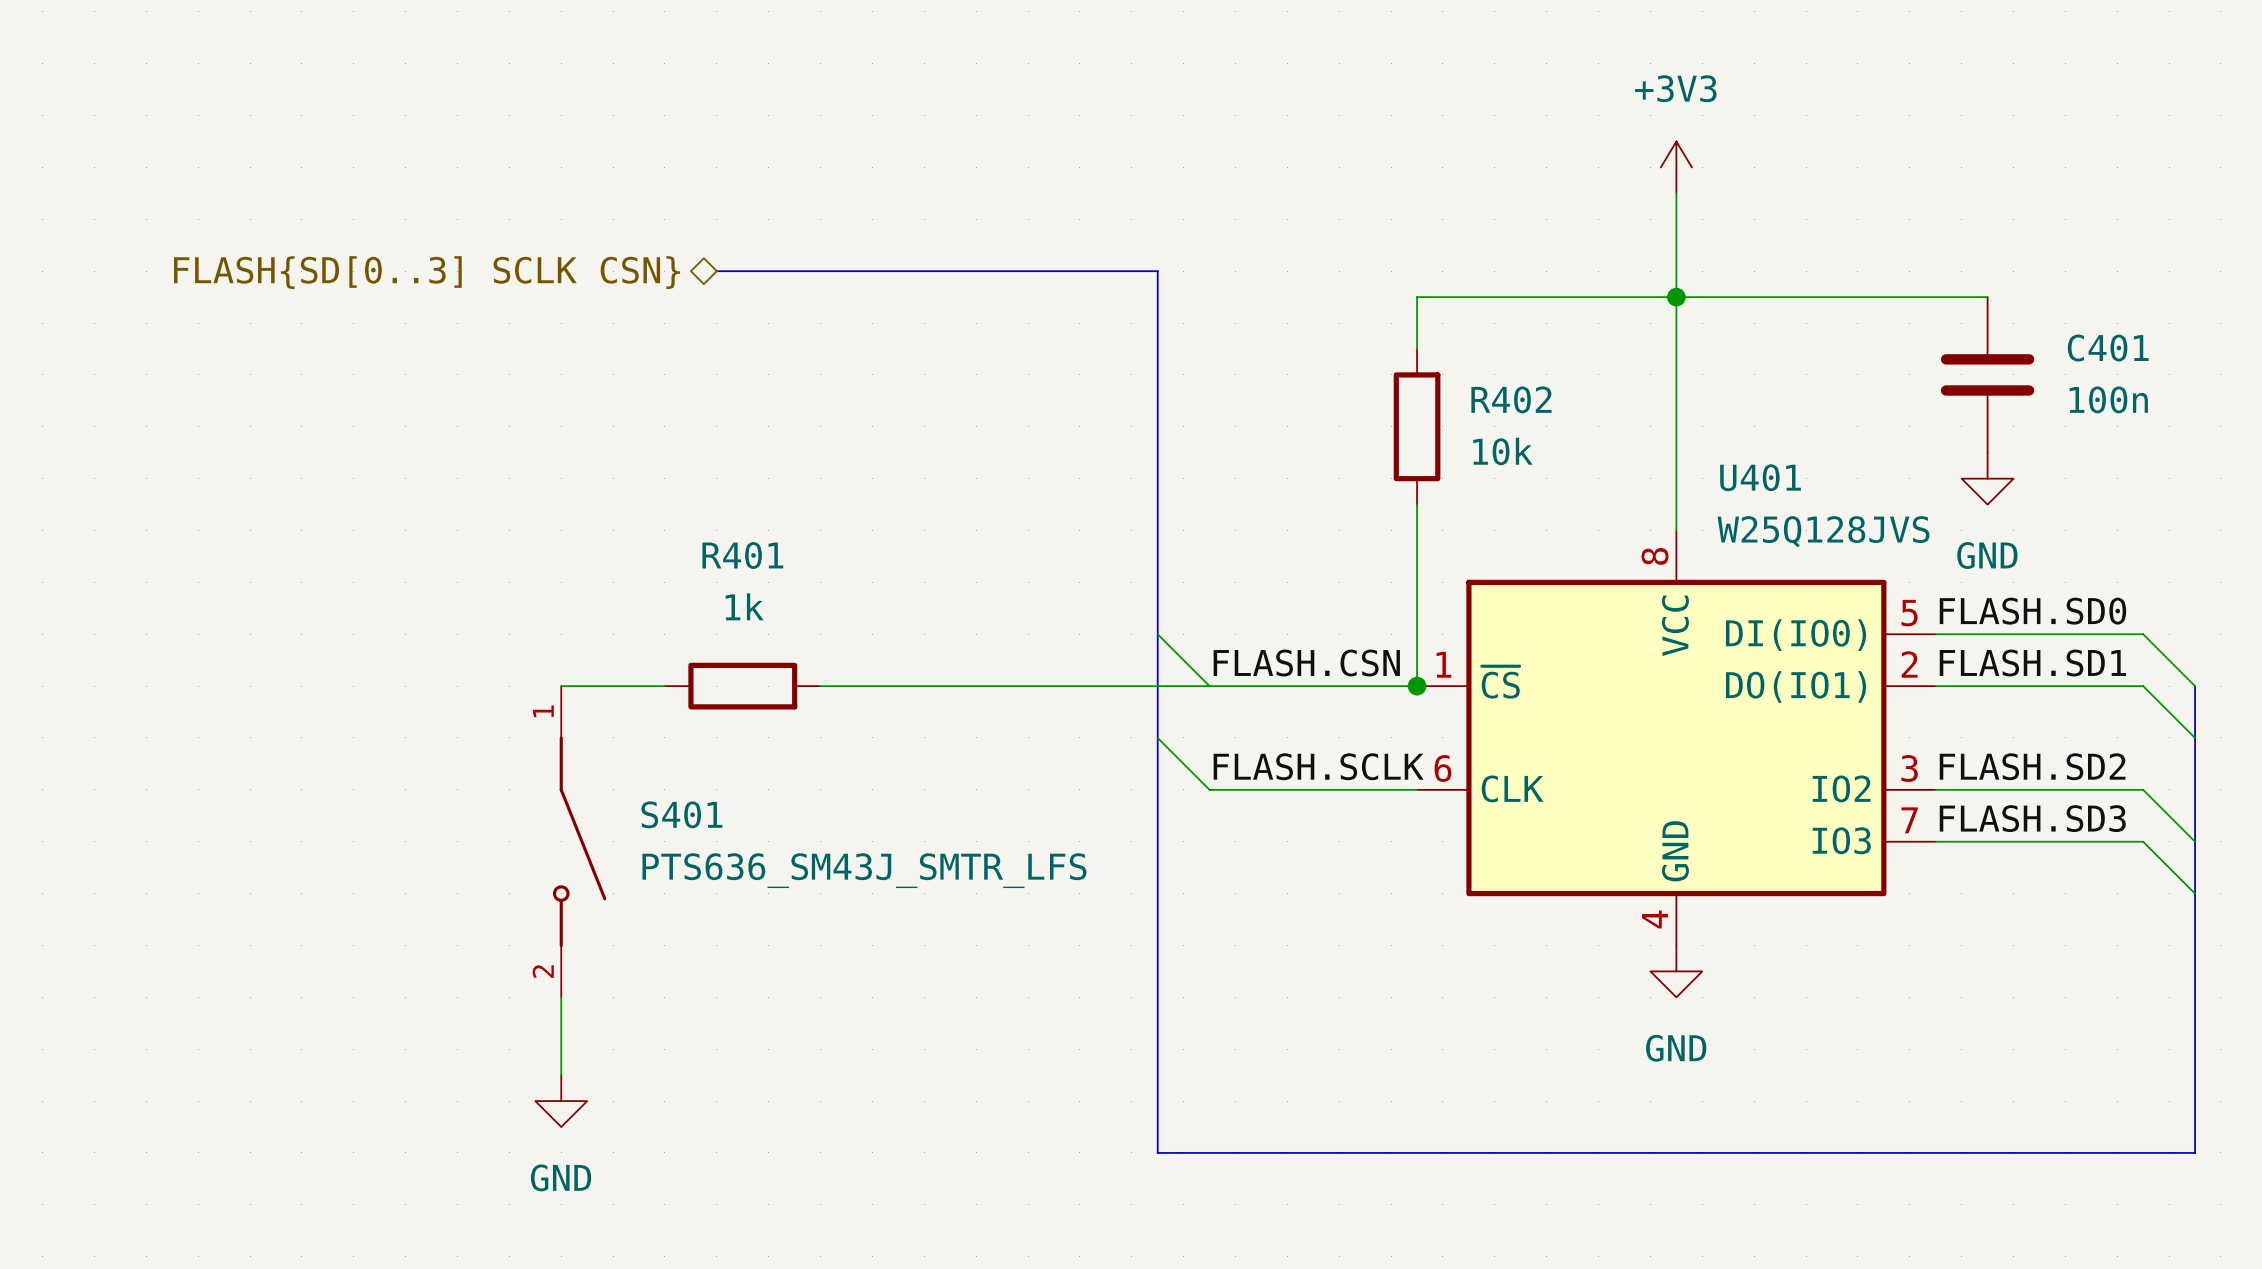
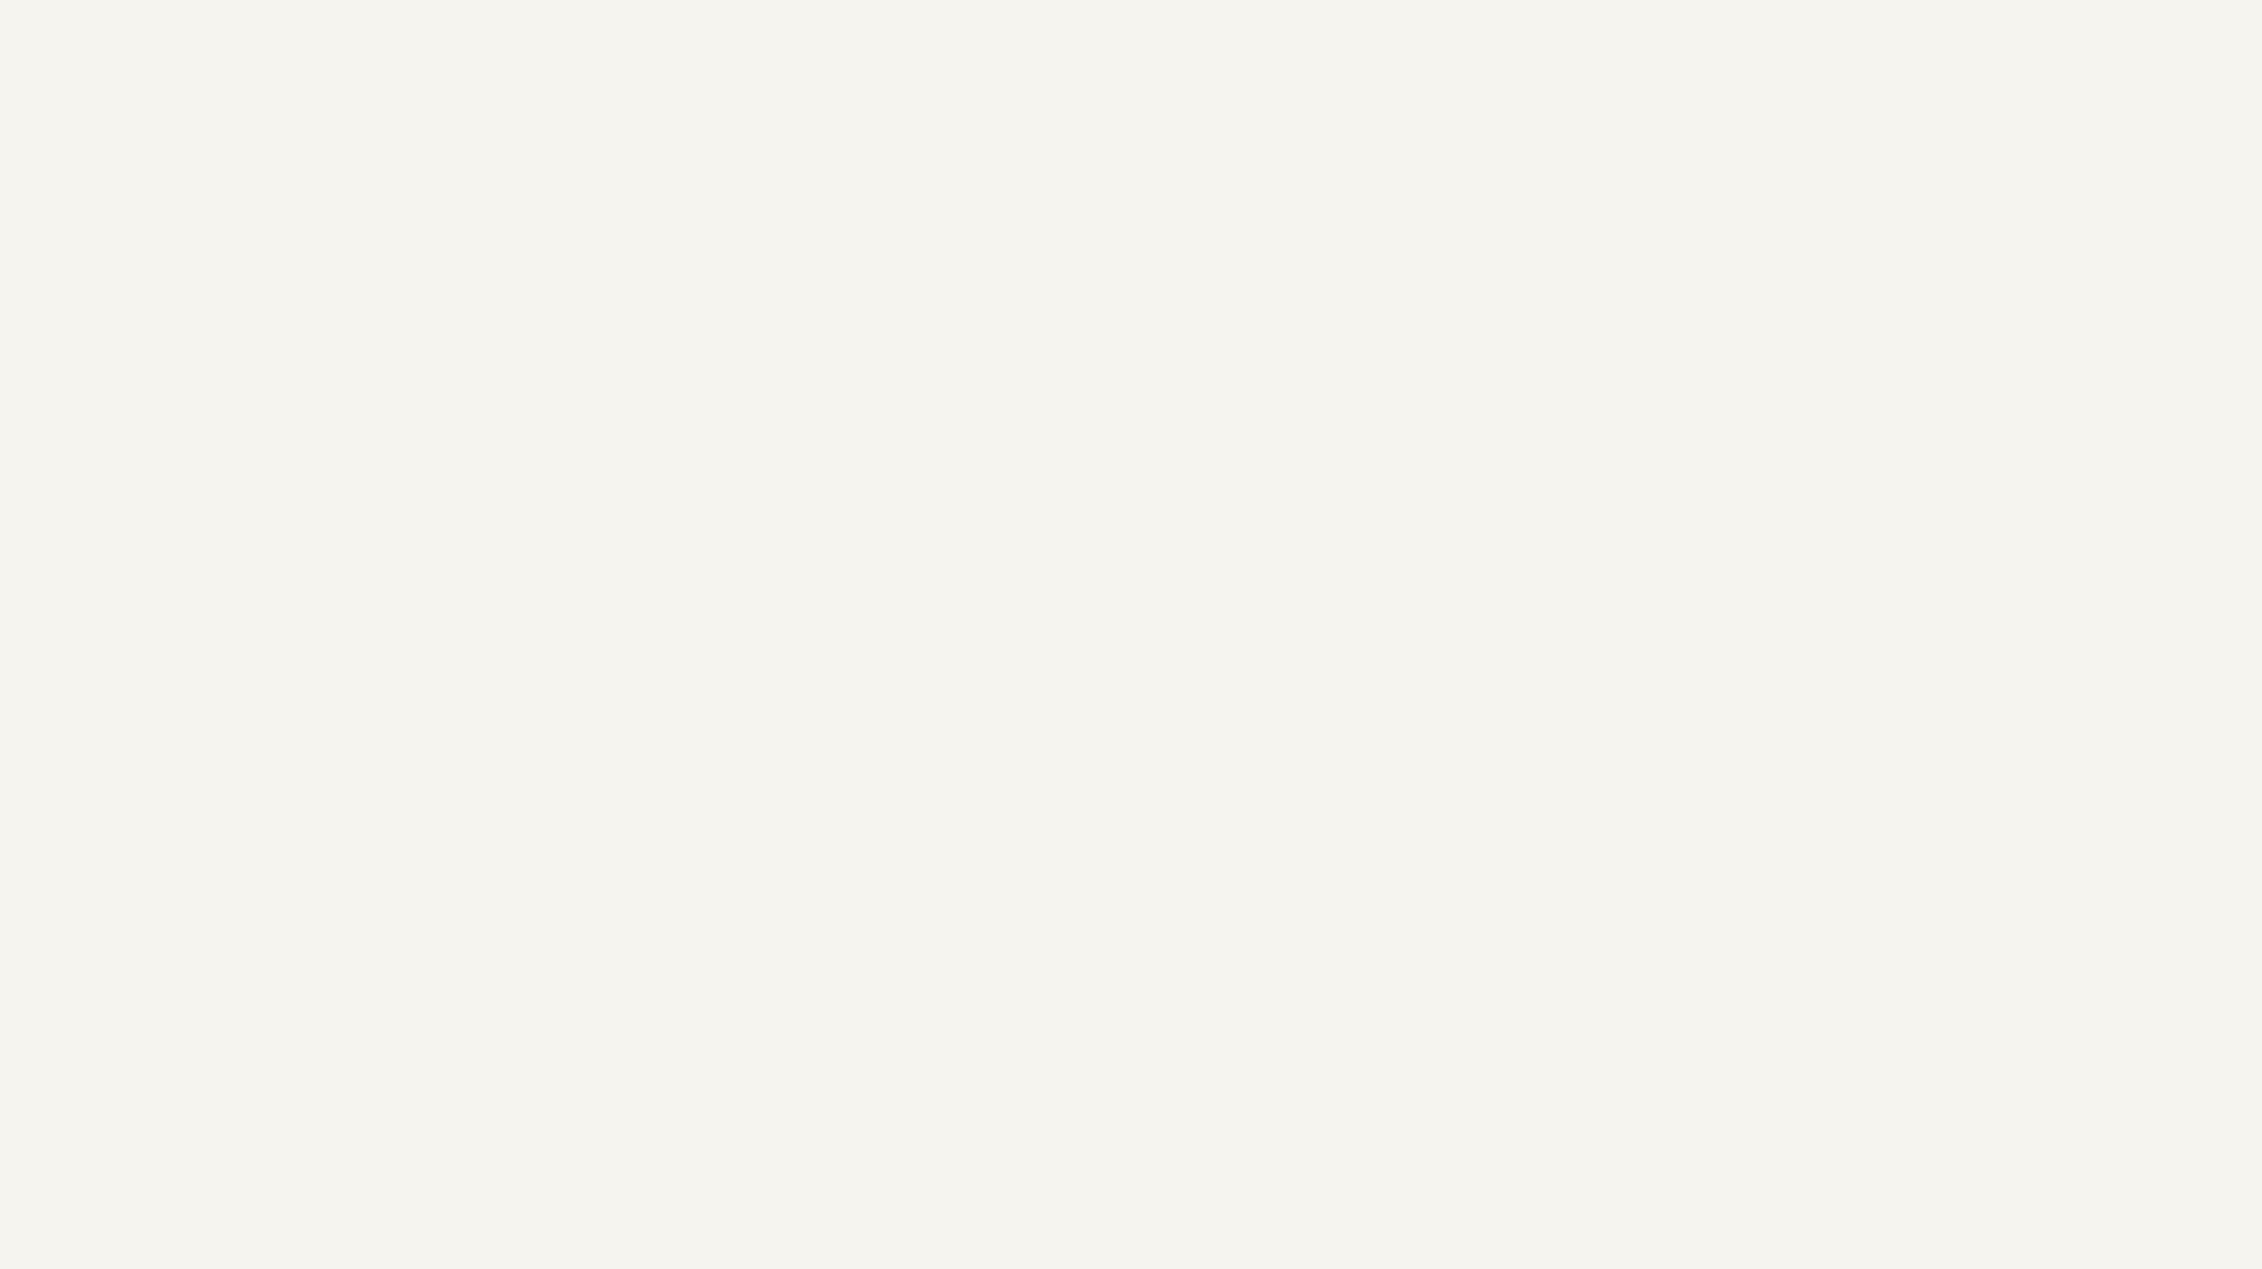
power symbol: +3V3 (1676, 167) -> none
wire: (1676, 193) (1676, 530) -> none
bus: (716, 271) (1157, 271) (1157, 1152) (2195, 1152) (2195, 686) -> none
hierarchical label: FLASH{SD[0..3] SCLK CSN} (427, 272) -> none
junction: (1676, 297) -> none
wire: (1987, 297) (1417, 297) (1417, 348) -> none
C401: 100n (1987, 374) -> none
R402: 10k (1417, 426) -> none
power symbol: GND (1987, 478) -> none
wire: (1417, 504) (1417, 686) (820, 686) -> none
label: FLASH.SD0 (2032, 611) -> none
wire: (1157, 634) (1209, 686) -> none
wire: (1935, 634) (2143, 634) (2195, 686) -> none
label: FLASH.CSN (1306, 663) -> none
label: FLASH.SD1 (2032, 663) -> none
wire: (561, 686) (664, 686) -> none
R401: 1k (742, 686) -> none
junction: (1417, 686) -> none
wire: (1935, 686) (2143, 686) (2195, 737) -> none
wire: (1157, 737) (1209, 789) (1417, 789) -> none
U401: W25Q128JVS (1676, 737) -> none
label: FLASH.SCLK (1318, 766) -> none
label: FLASH.SD2 (2032, 766) -> none
wire: (1935, 789) (2143, 789) (2195, 841) -> none
label: FLASH.SD3 (2032, 818) -> none
S401: PTS636_SM43J_SMTR_LFS (579, 841) -> none
wire: (1935, 841) (2143, 841) (2195, 893) -> none
power symbol: GND (1676, 971) -> none
wire: (561, 997) (561, 1075) -> none
power symbol: GND (561, 1101) -> none

